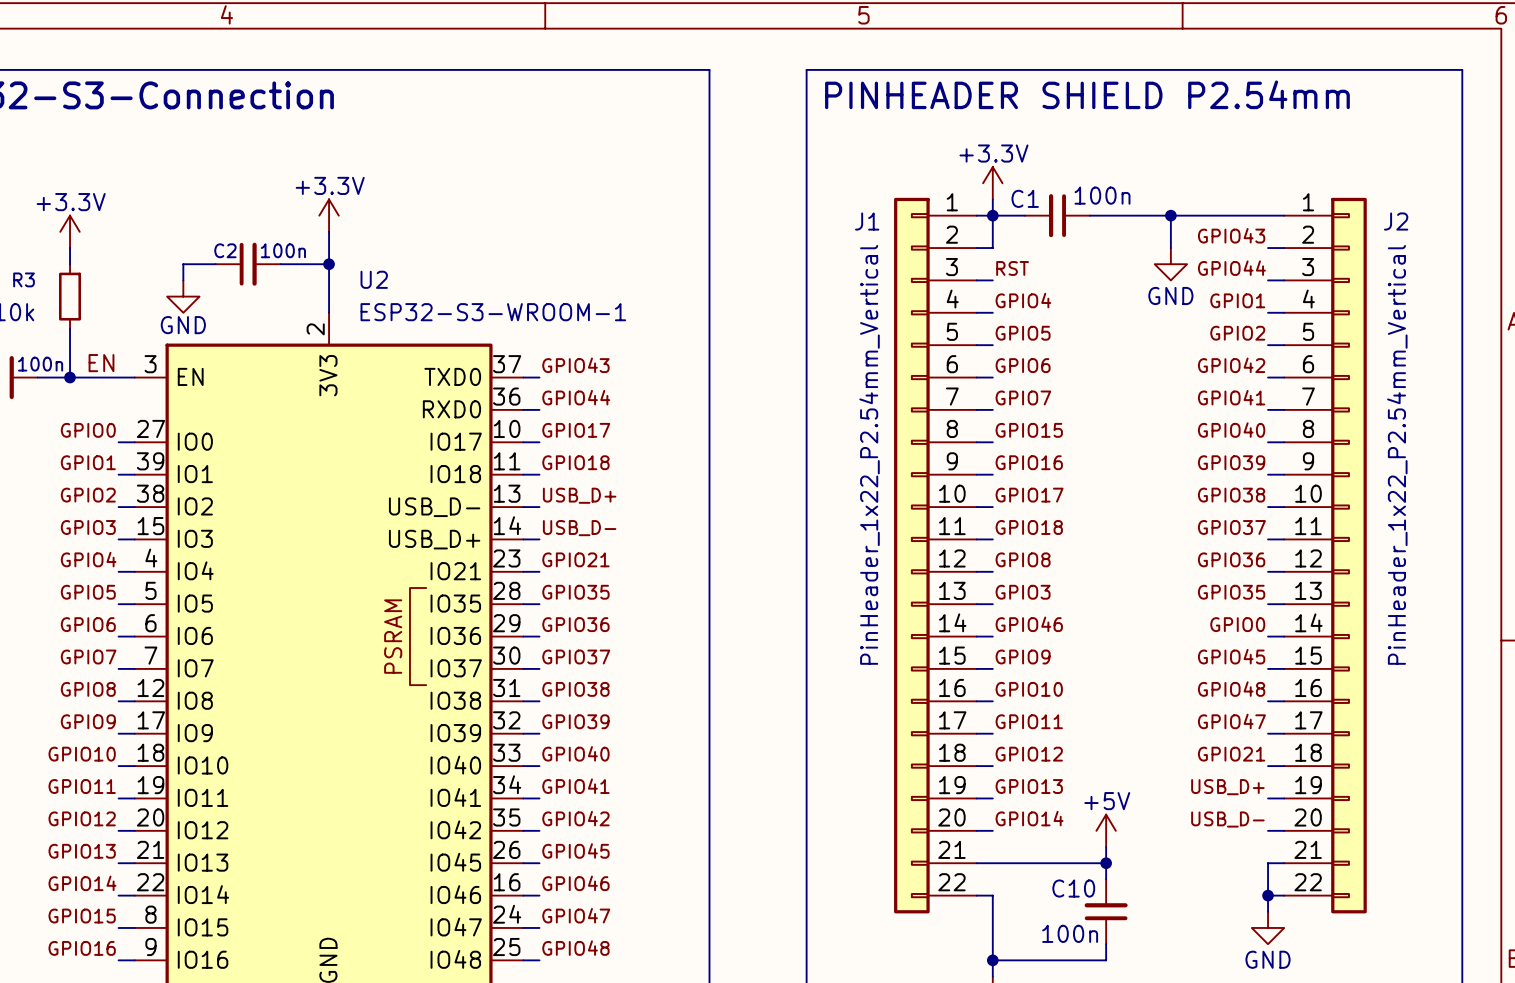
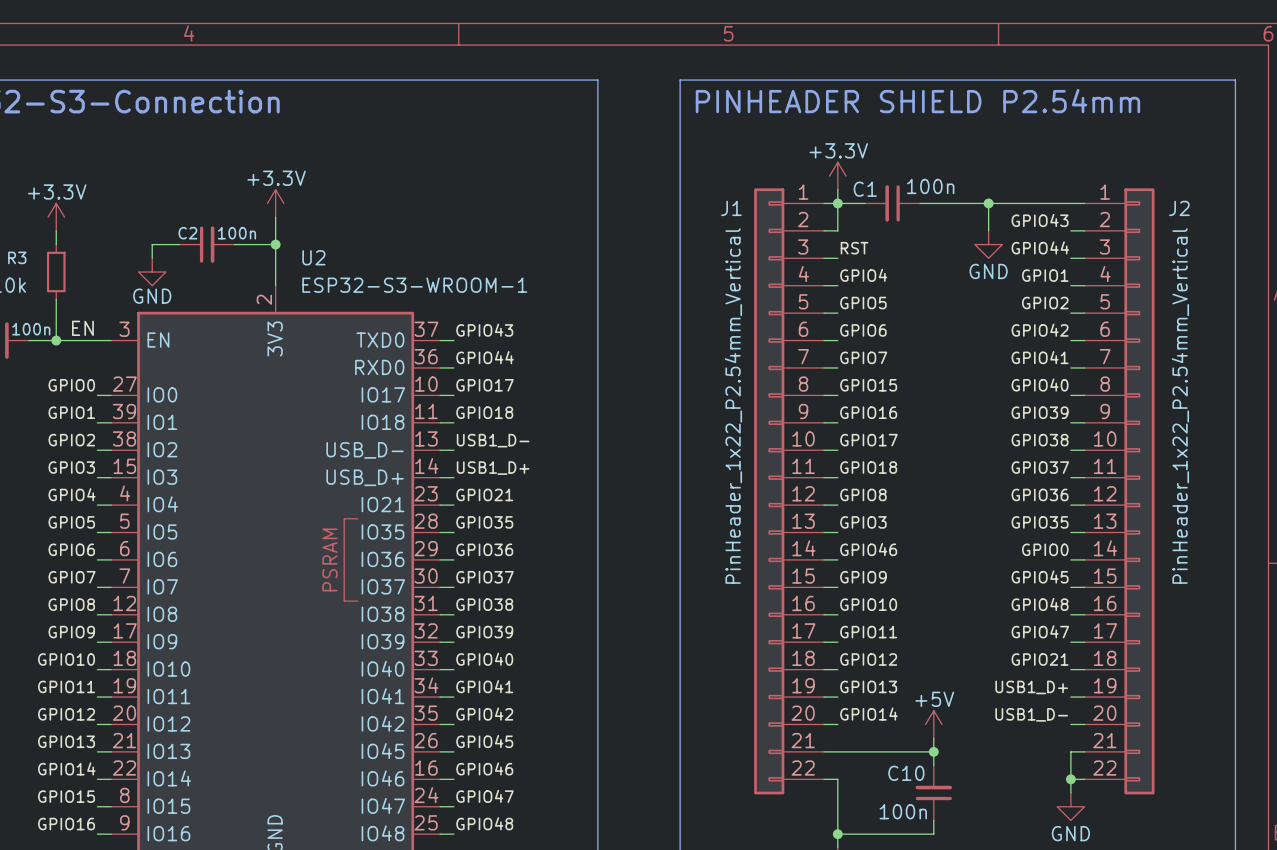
label: USB_D+ (579, 495) -> USB1_D- (493, 440)
label: USB_D- (579, 528) -> USB1_D+ (493, 468)
label: USB_D+ (1227, 787) -> USB1_D+ (1031, 687)
label: USB_D- (1227, 819) -> USB1_D- (1031, 714)

